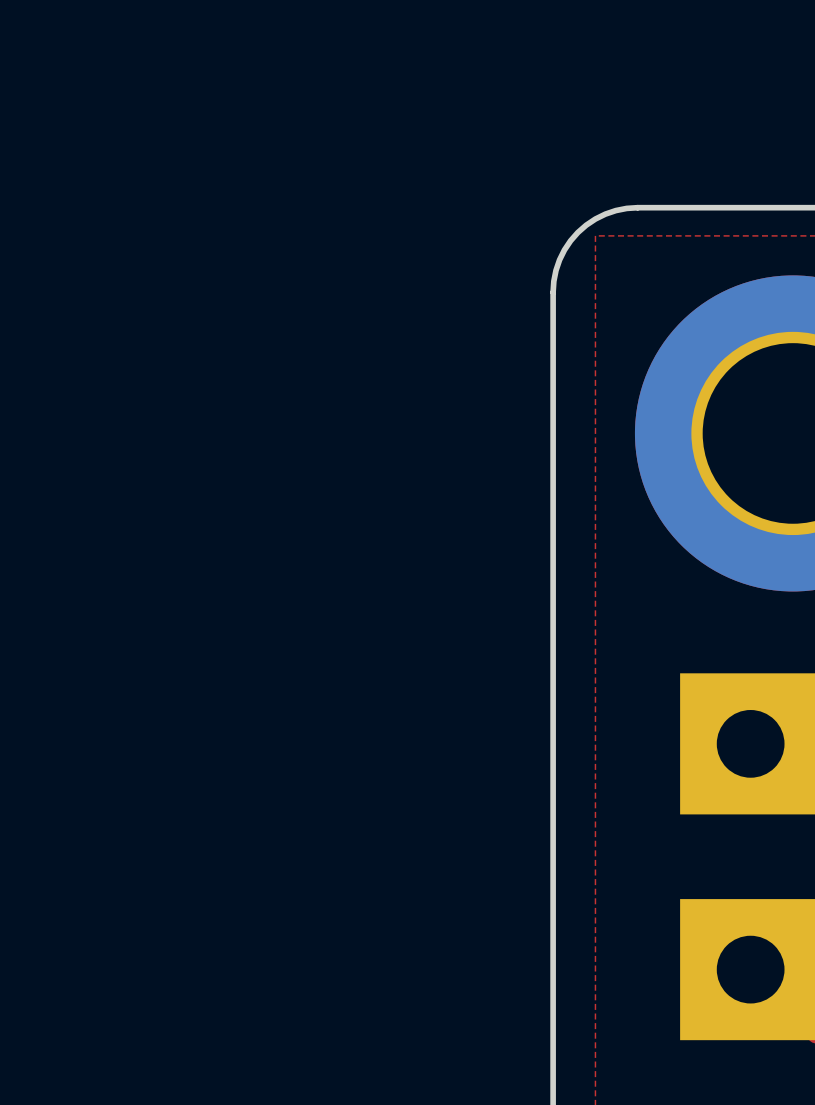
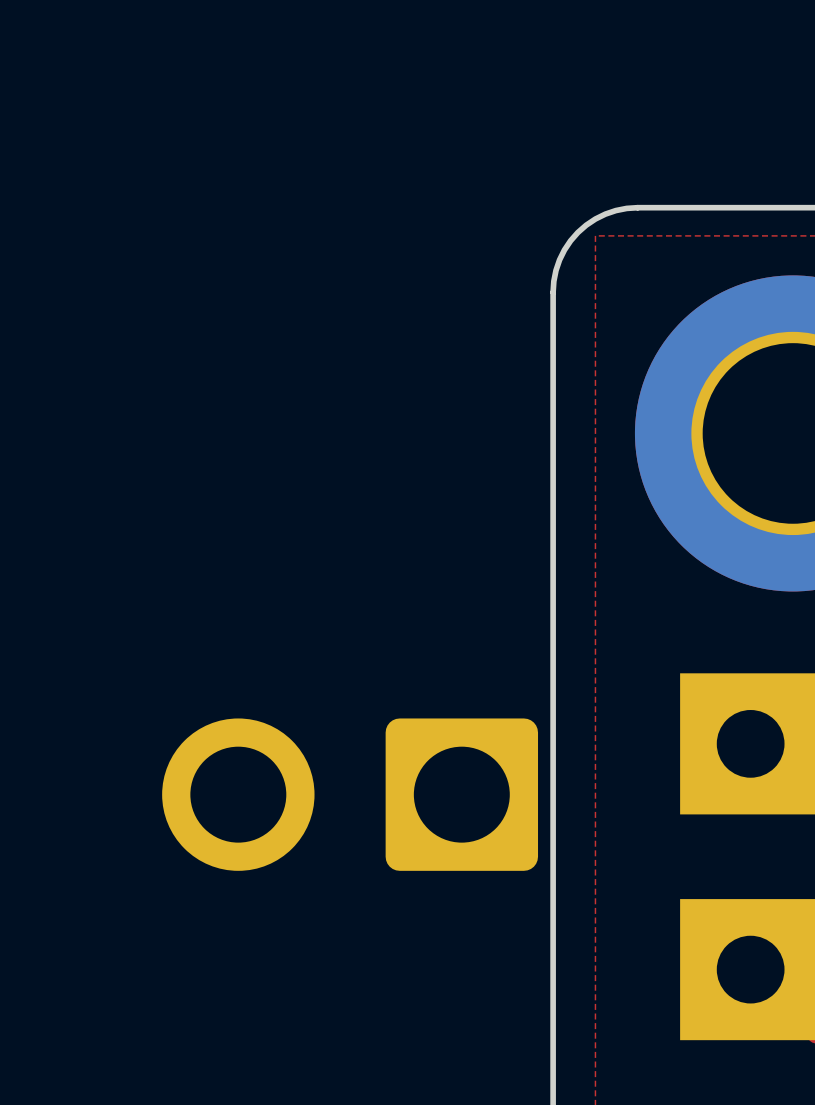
part: none -> (350, 794)

